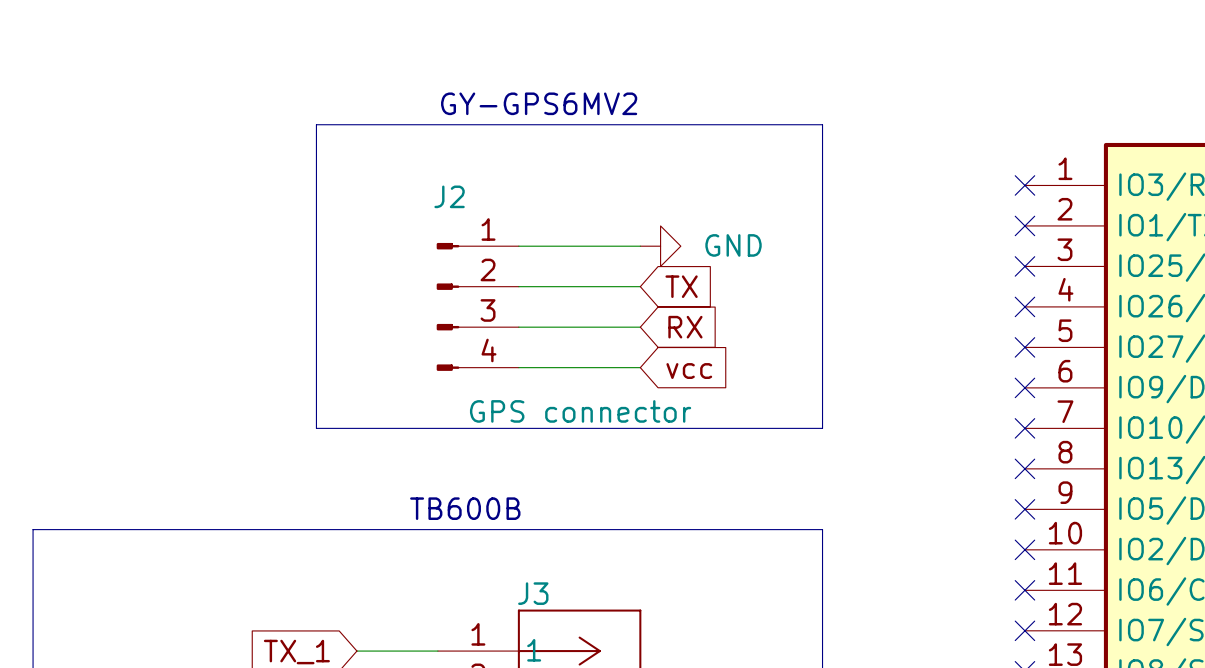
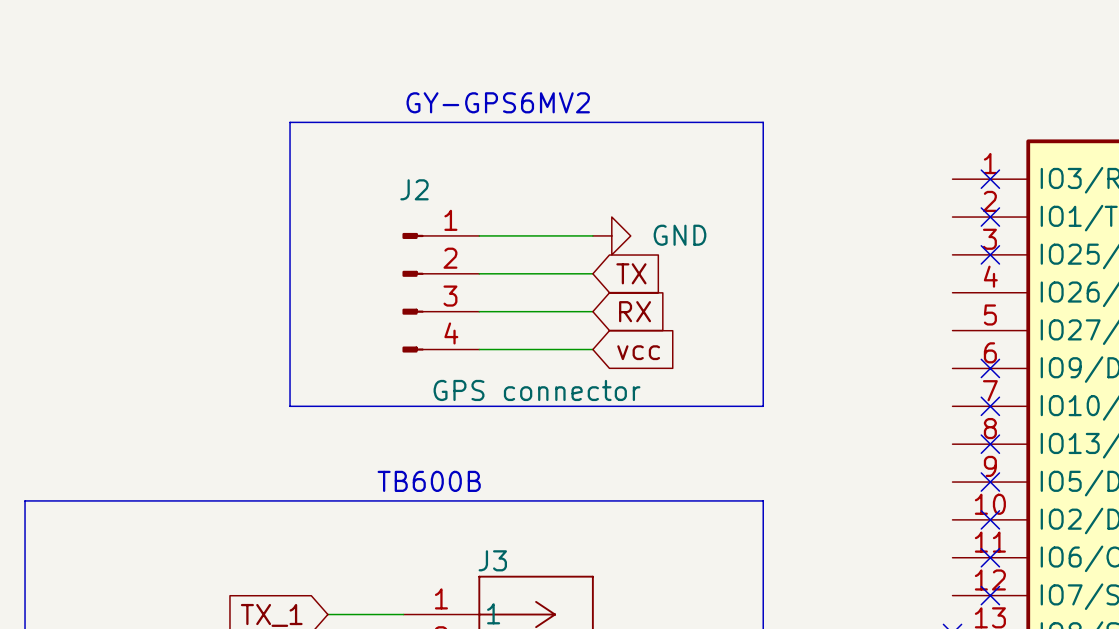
no-connect mark: (1024, 185) -> none
no-connect mark: none -> (990, 179)
no-connect mark: (1024, 225) -> none
no-connect mark: none -> (990, 217)
no-connect mark: (1024, 266) -> none
no-connect mark: none -> (990, 254)
no-connect mark: (1024, 306) -> none
no-connect mark: (1024, 347) -> none
no-connect mark: (1024, 387) -> none
no-connect mark: none -> (990, 368)
no-connect mark: (1024, 428) -> none
no-connect mark: none -> (990, 406)
no-connect mark: (1024, 468) -> none
no-connect mark: none -> (990, 444)
no-connect mark: (1024, 509) -> none
no-connect mark: none -> (990, 482)
no-connect mark: (1024, 549) -> none
no-connect mark: none -> (990, 519)
no-connect mark: (1024, 590) -> none
no-connect mark: none -> (990, 557)
no-connect mark: (1024, 630) -> none
no-connect mark: none -> (990, 595)

